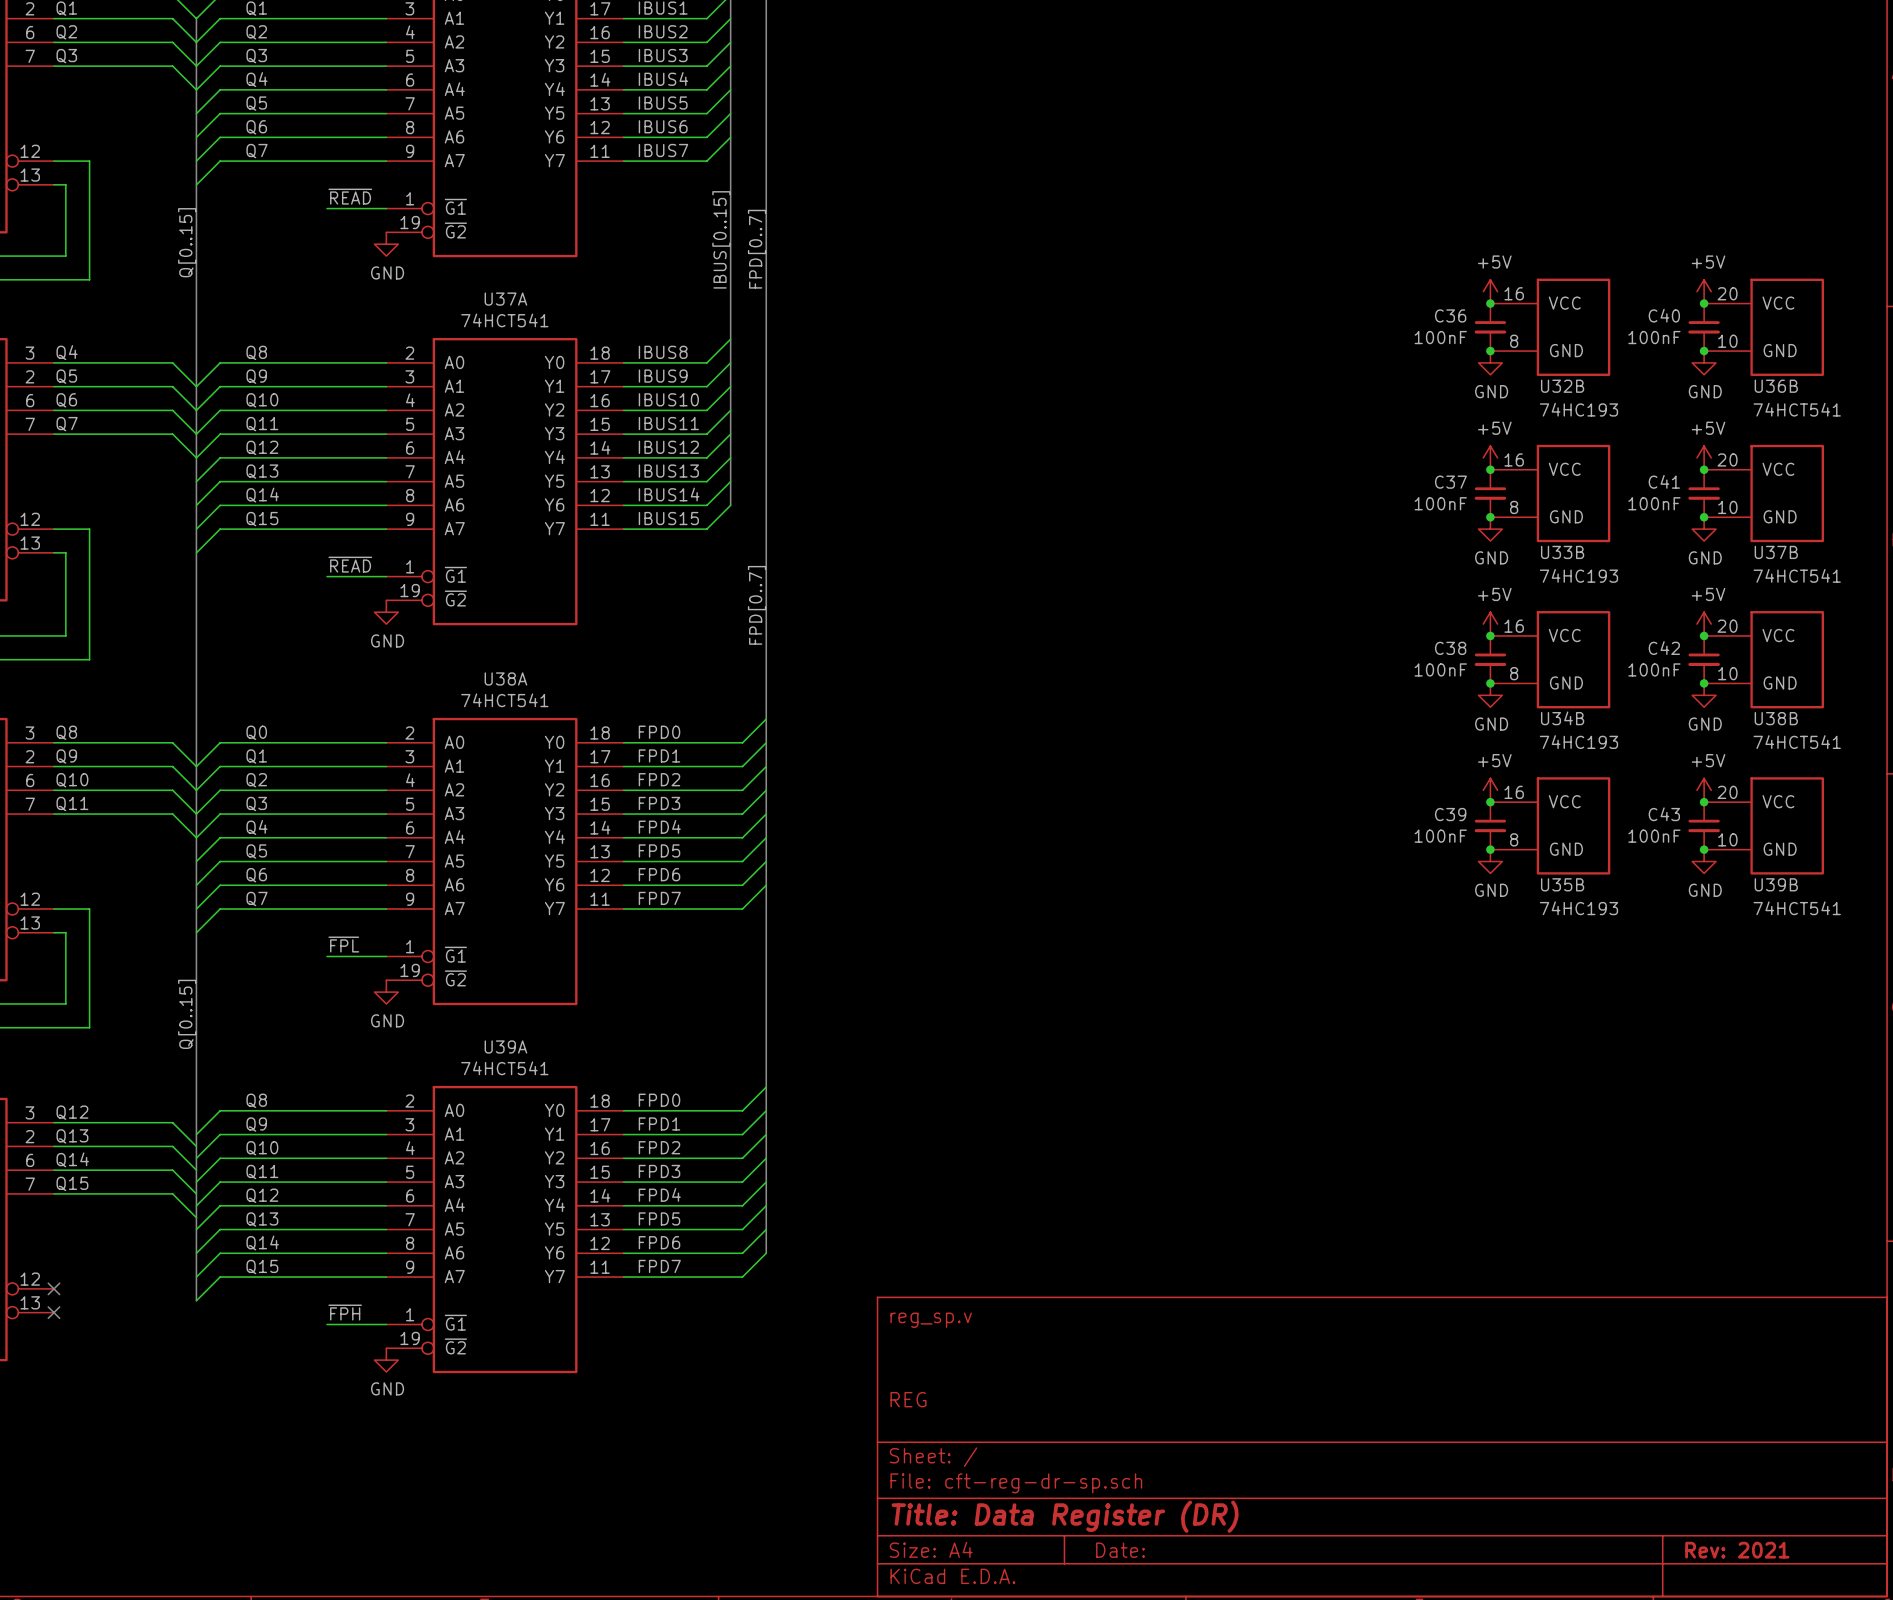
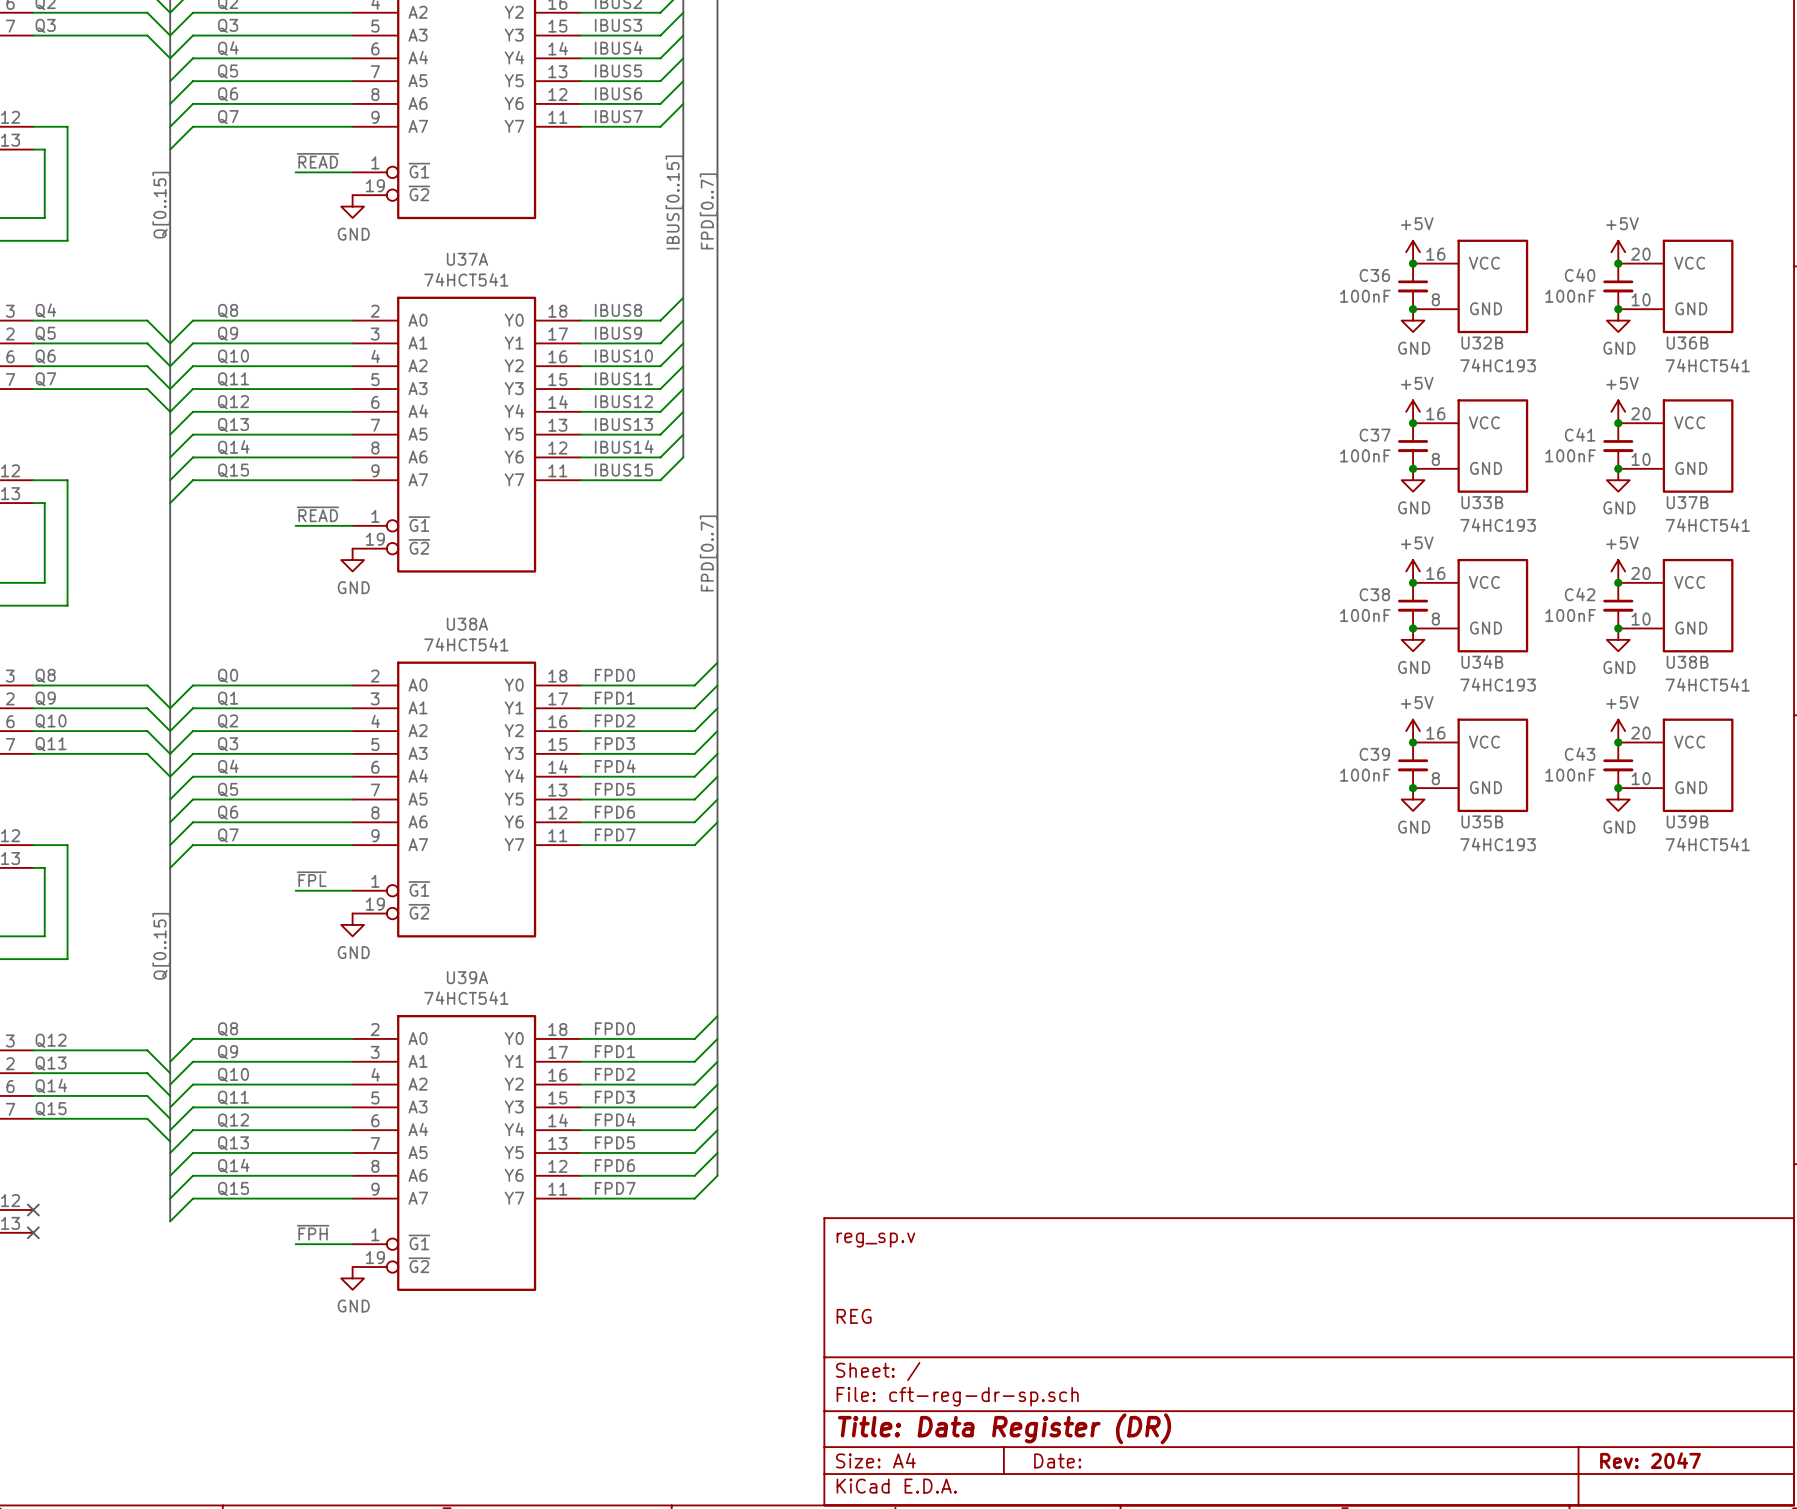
title block: Rev: 2021 (1737, 1550) -> Rev: 2047 (1650, 1460)

